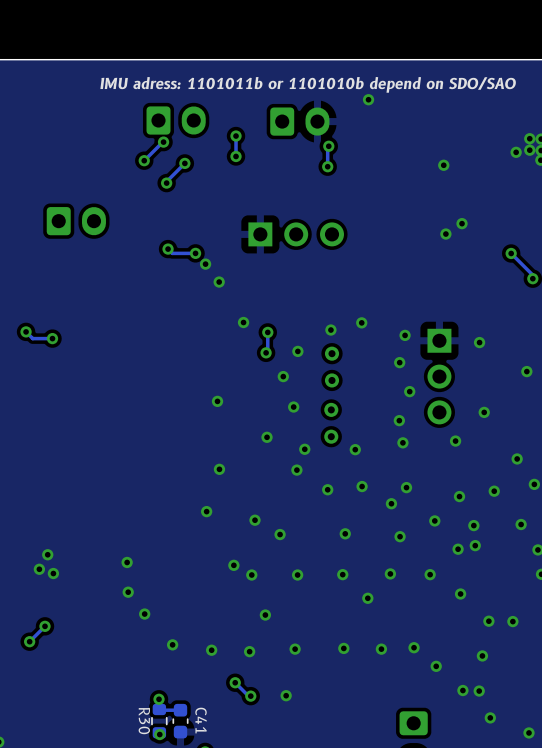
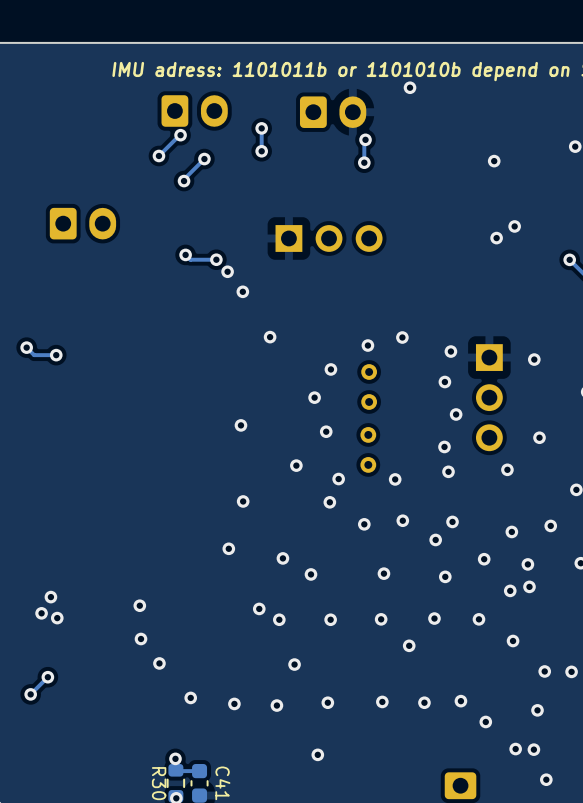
track: (267, 332) (267, 351) (266, 352) -> none
via: (267, 332) -> none
via: (266, 352) -> none
track: (235, 682) (250, 696) -> none
via: (235, 682) -> none
via: (250, 696) -> none

